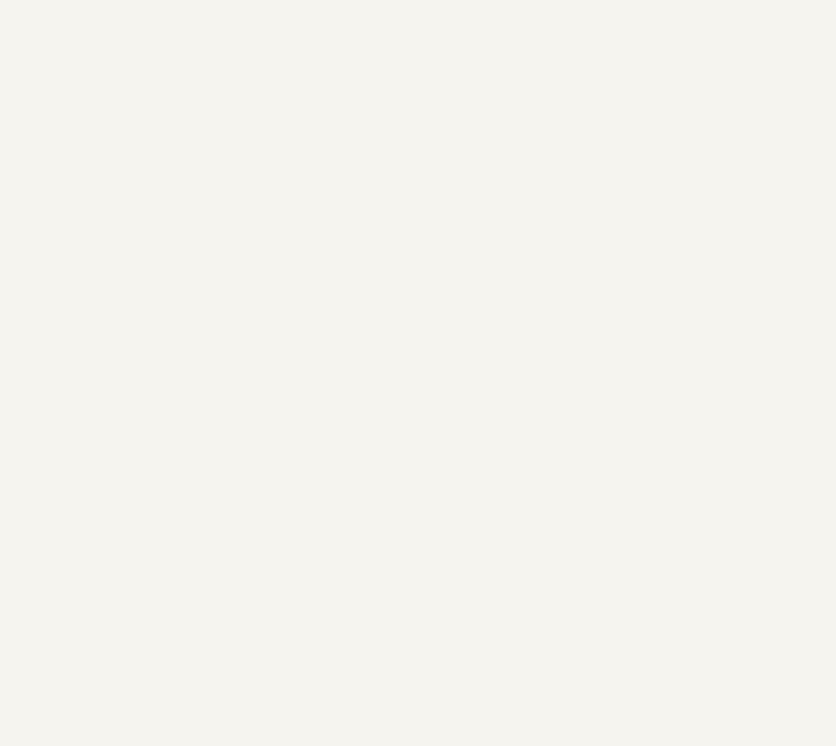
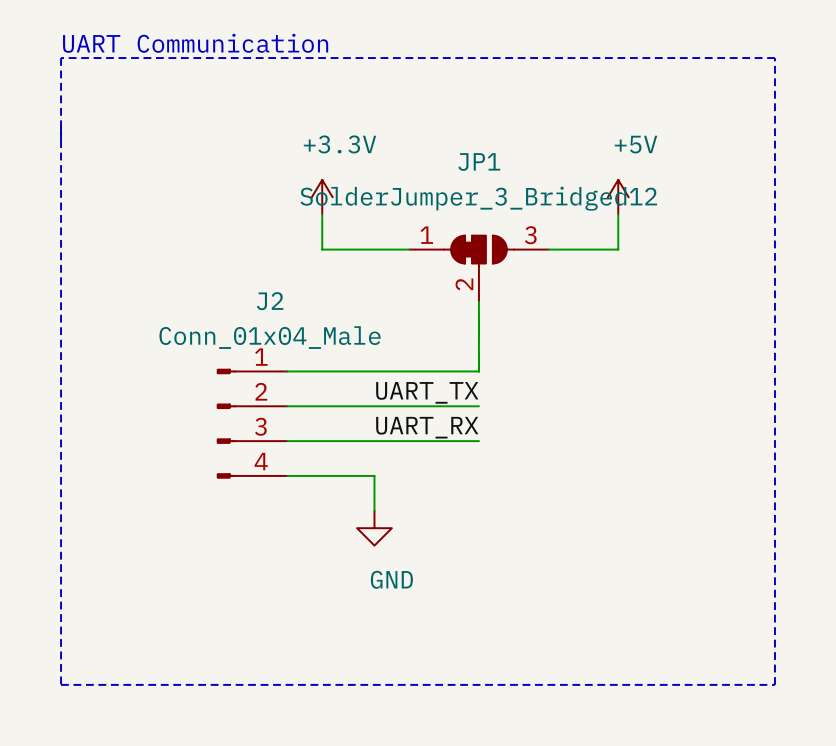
text: none -> UART Communication (195, 43)
line: none -> (61, 58) (61, 684) (774, 684) (774, 58) (61, 58)
power symbol: none -> +3.3V (322, 197)
power symbol: none -> +5V (618, 197)
wire: none -> (322, 214) (322, 249) (409, 249)
wire: none -> (618, 214) (618, 249) (548, 249)
JP1: none -> SolderJumper_3_Bridged12 (478, 268)
wire: none -> (478, 301) (478, 371) (287, 371)
label: none -> UART_TX (427, 392)
wire: none -> (287, 406) (478, 406)
J2: none -> Conn_01x04_Male (252, 423)
label: none -> UART_RX (427, 427)
wire: none -> (287, 441) (478, 441)
wire: none -> (287, 475) (374, 475) (374, 510)
power symbol: none -> GND (374, 528)

